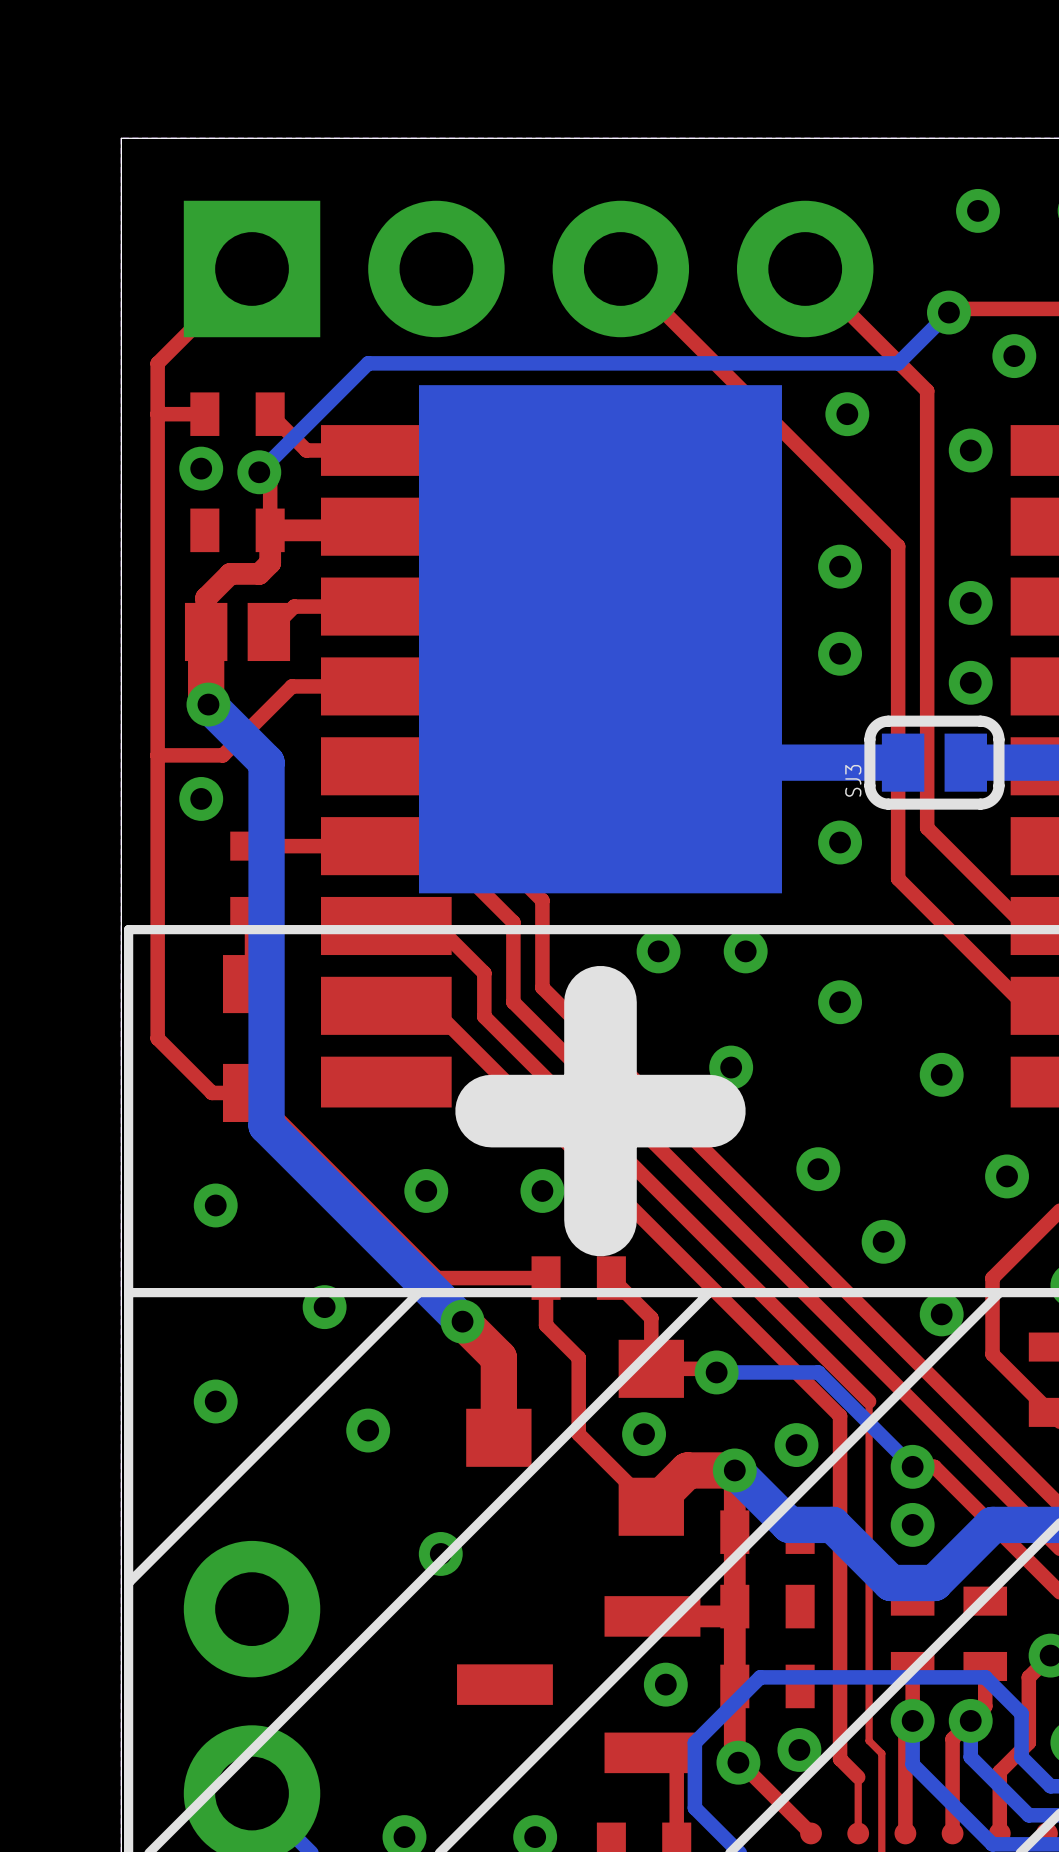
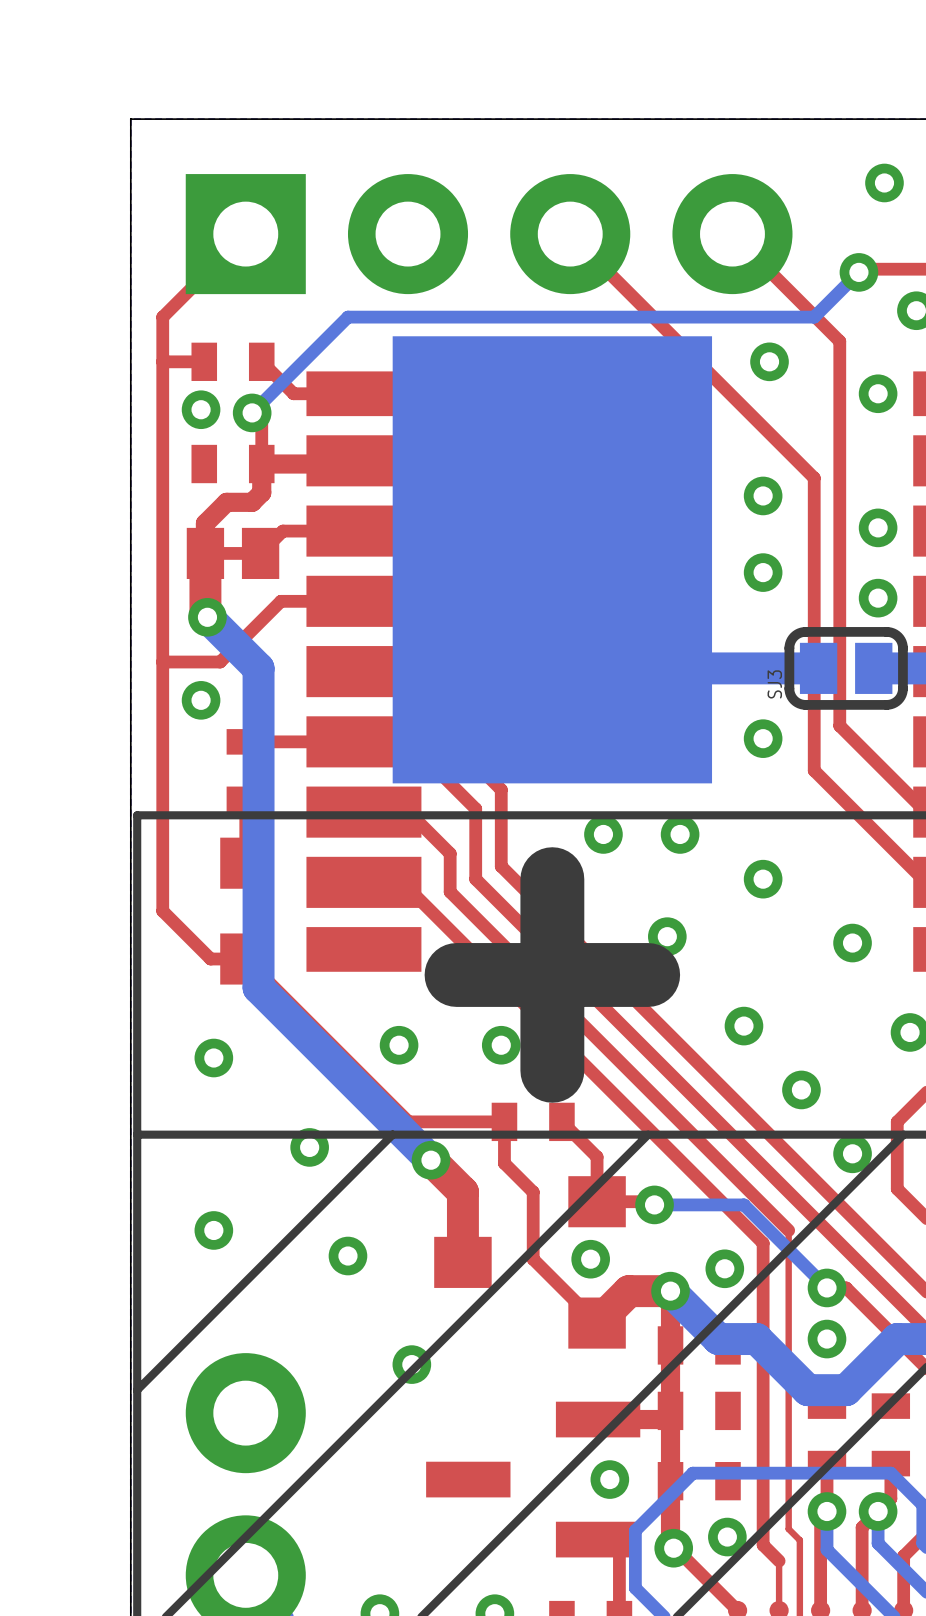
drawing: none -> [220, 547, 246, 560]

